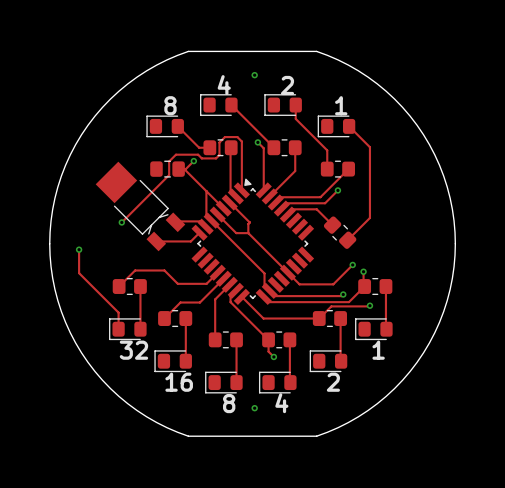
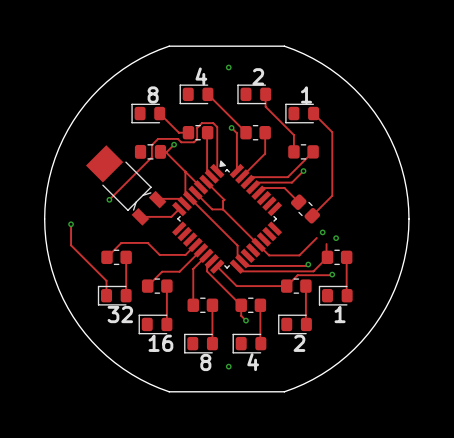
via: none -> (322, 232)
via: (352, 264) -> none
via: none -> (336, 238)
via: (363, 271) -> none

